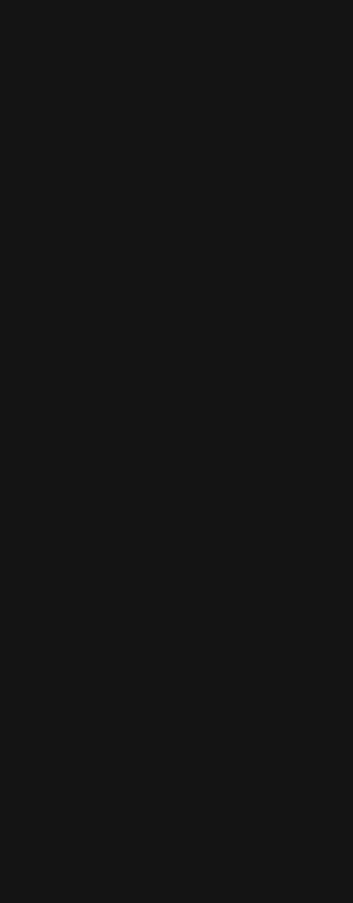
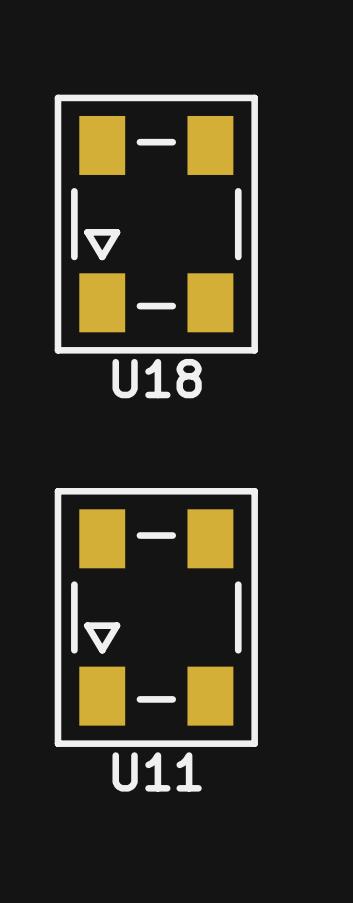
U18: none -> (156, 224)
U11: none -> (156, 617)

